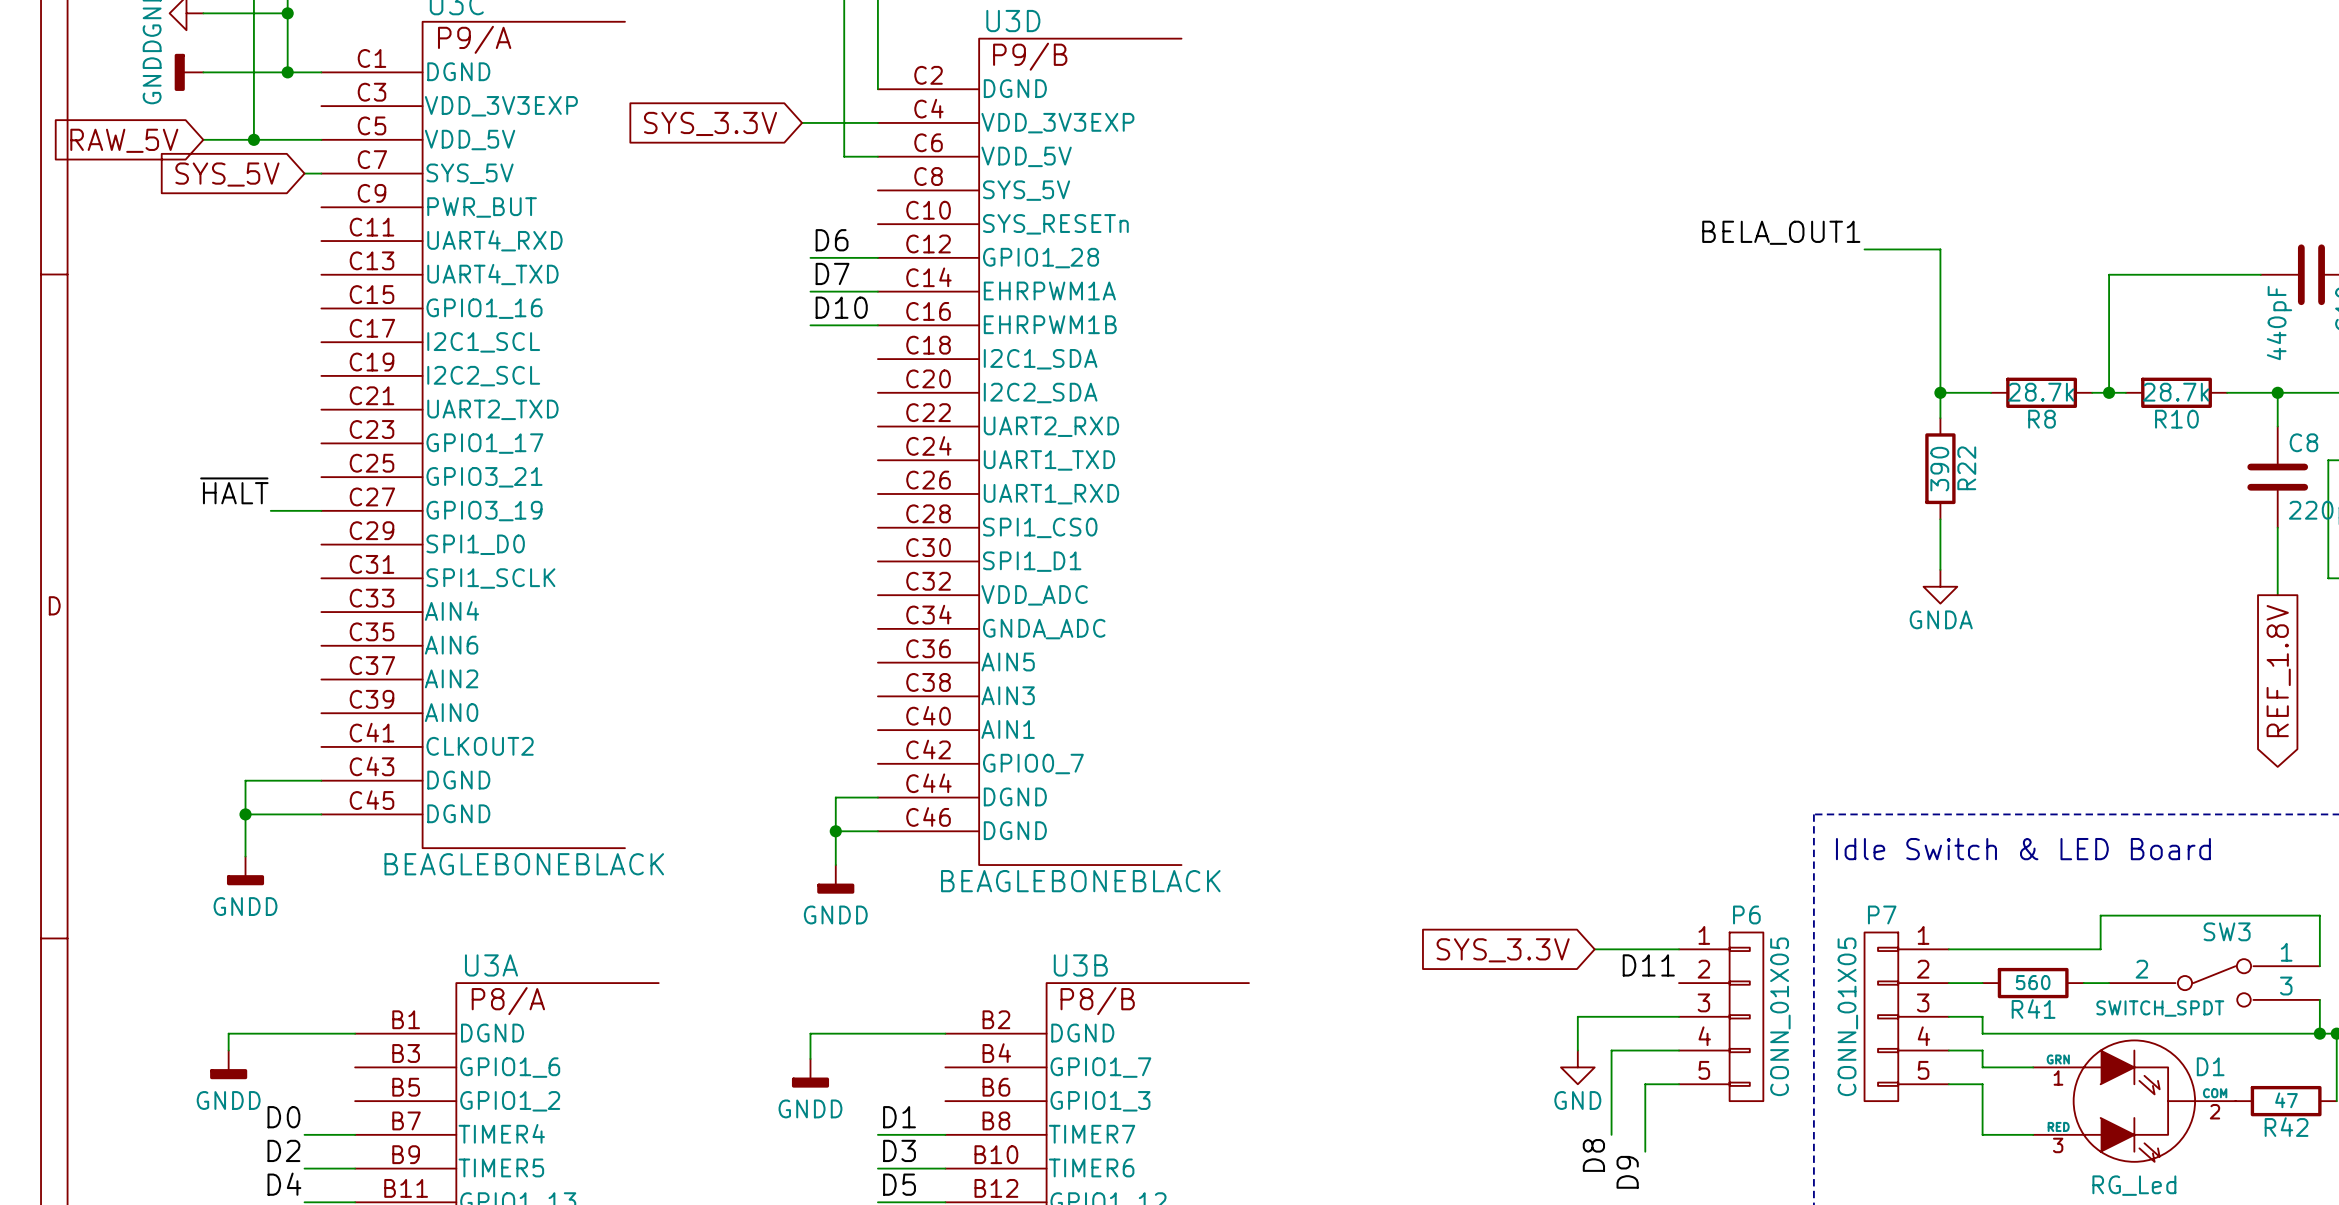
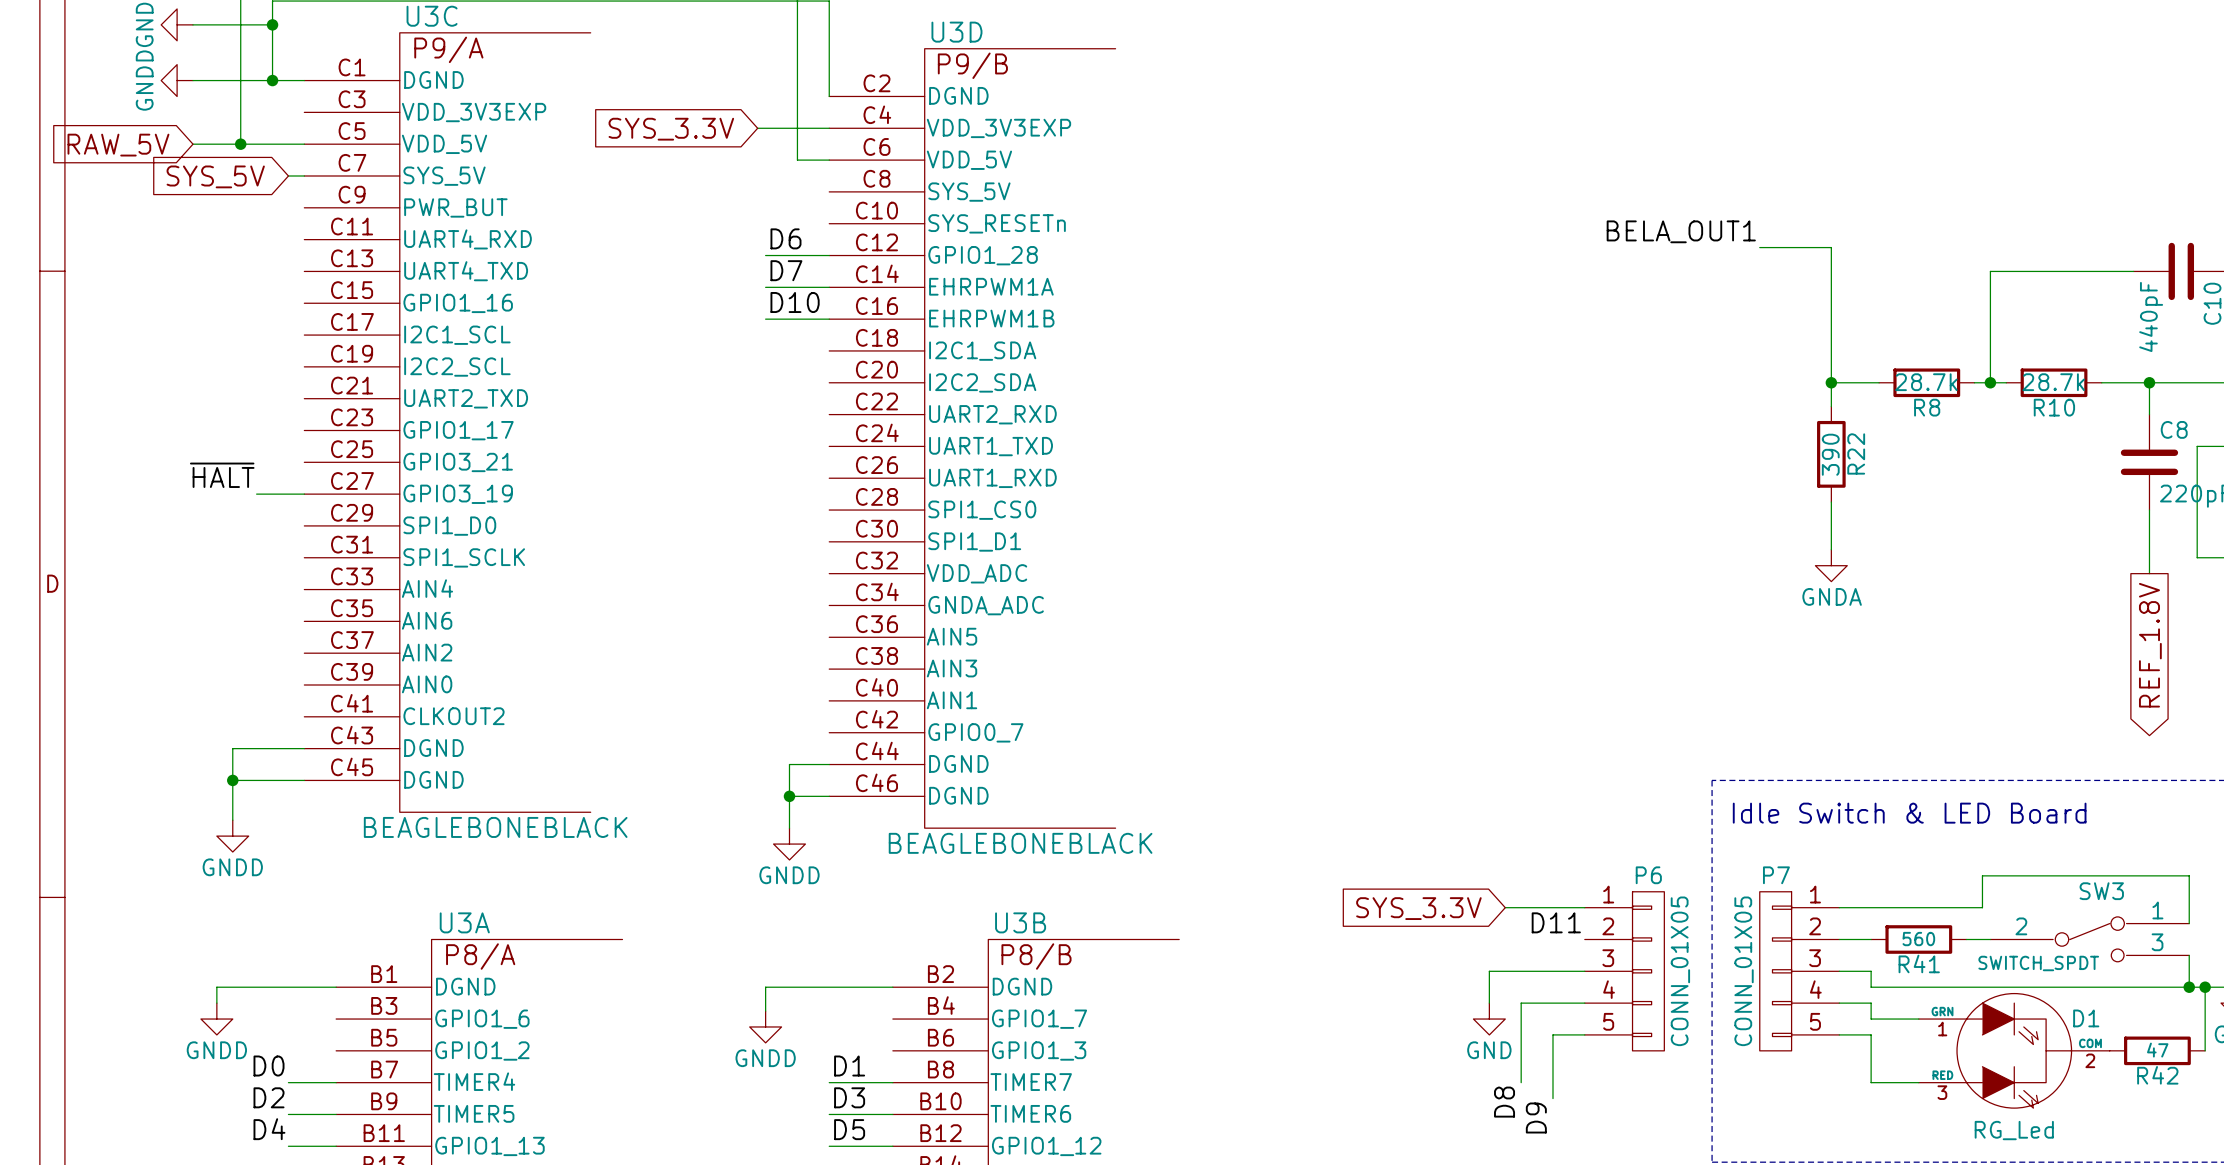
power symbol shape: [174, 53, 204, 91] -> [161, 64, 194, 97]
power symbol shape: [226, 856, 265, 886] -> [216, 820, 249, 853]
power symbol shape: [817, 865, 855, 894] -> [773, 828, 806, 860]
power symbol shape: [210, 1050, 248, 1080] -> [200, 1003, 233, 1035]
power symbol shape: [791, 1058, 830, 1088] -> [749, 1011, 782, 1043]

